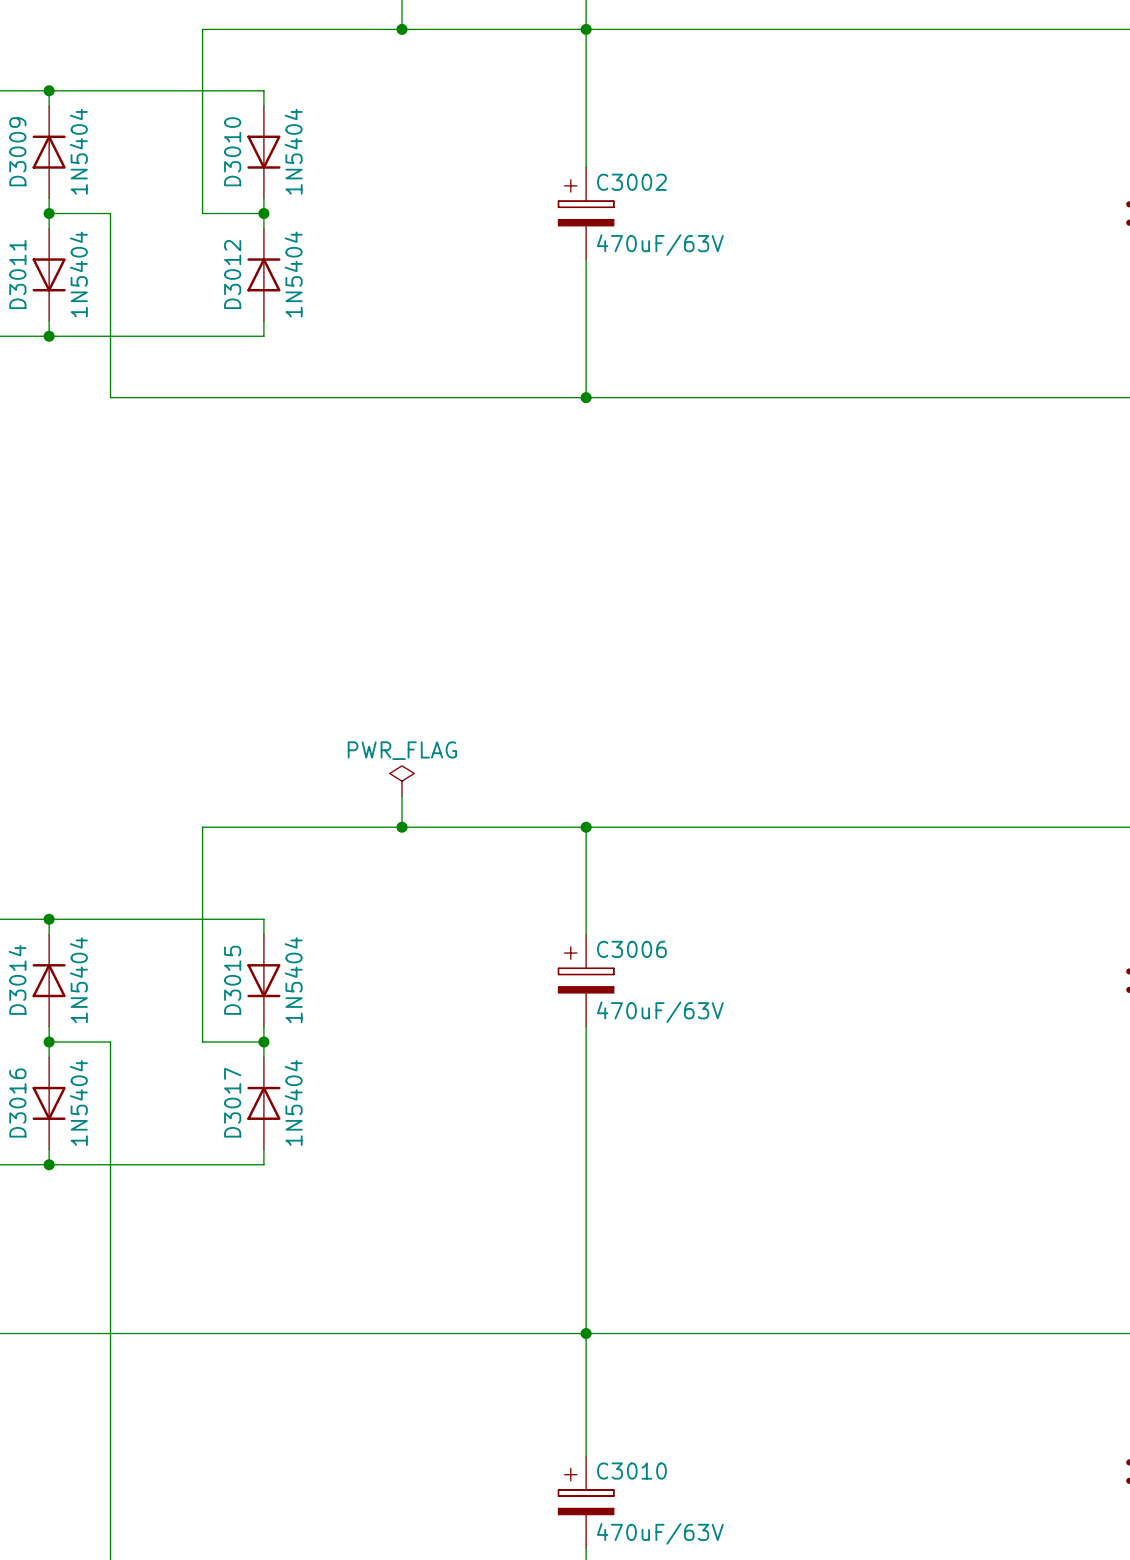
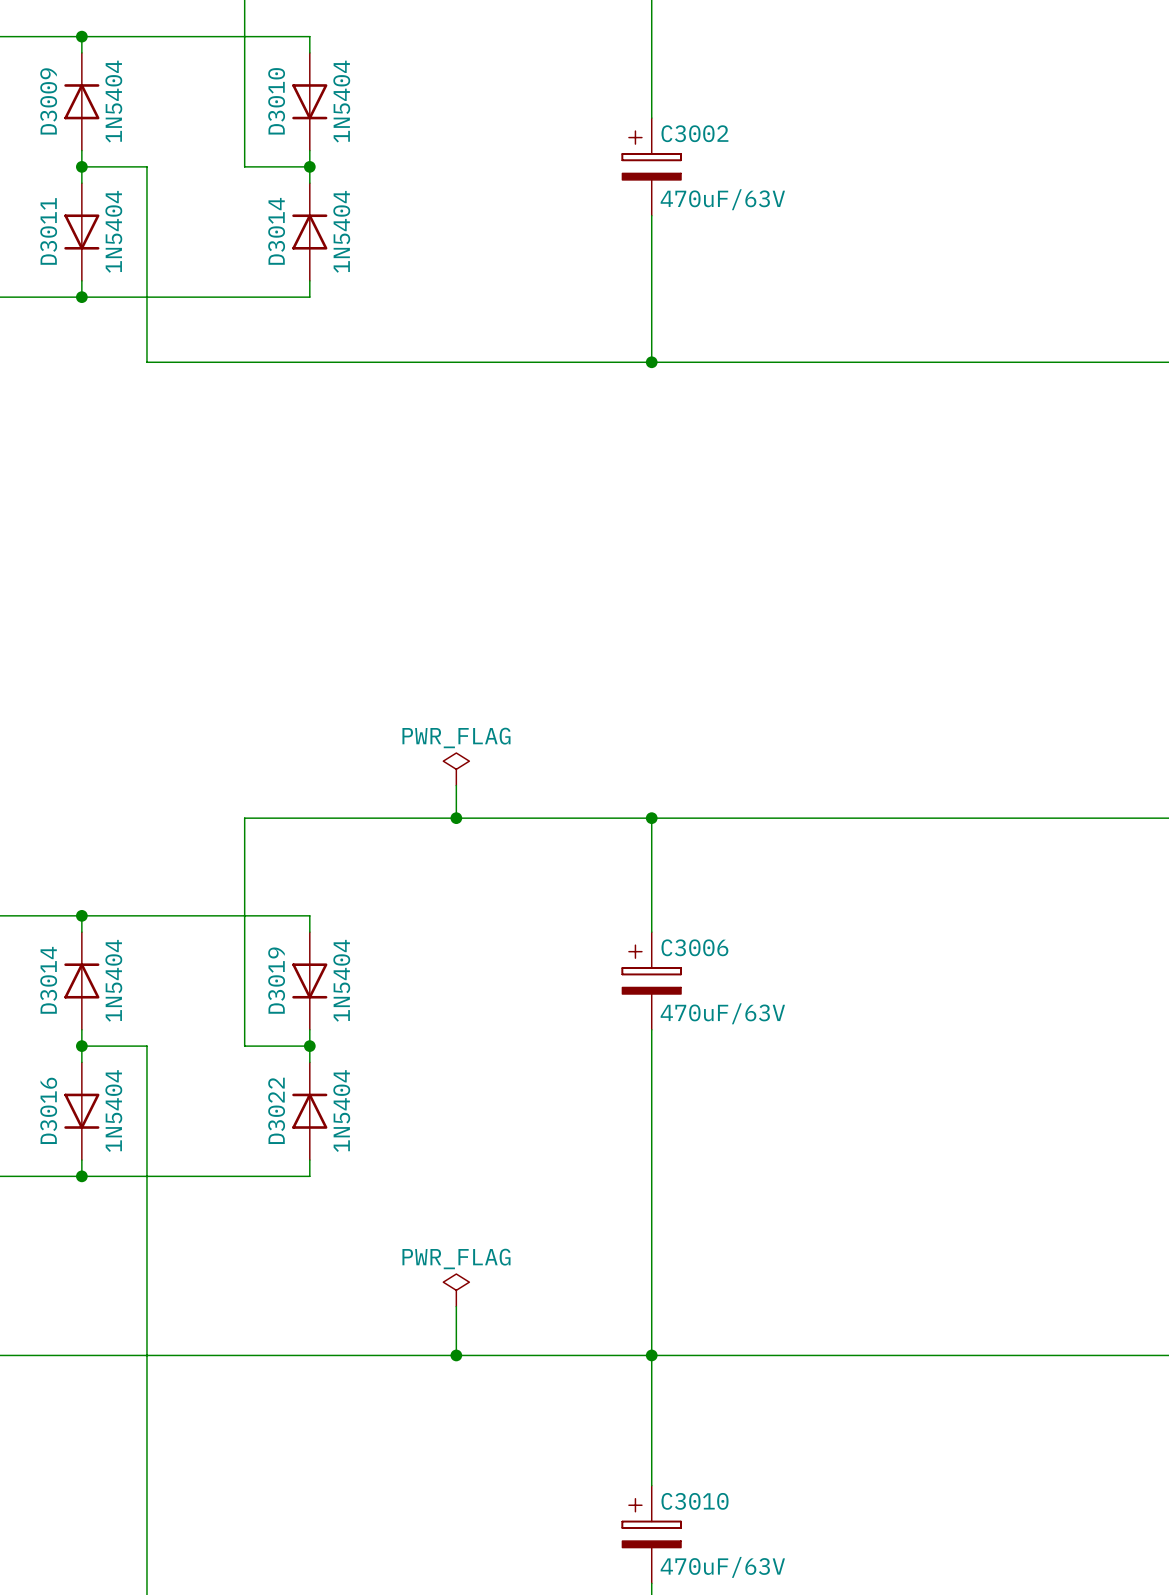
D3012 name: D3012 (232, 274) -> D3014 (276, 231)
D3015 name: D3015 (232, 980) -> D3019 (276, 980)
D3017 name: D3017 (232, 1102) -> D3022 (276, 1110)
power symbol: none -> PWR_FLAG (456, 1290)
wire: none -> (456, 1306) (456, 1355)
junction: none -> (456, 1355)

